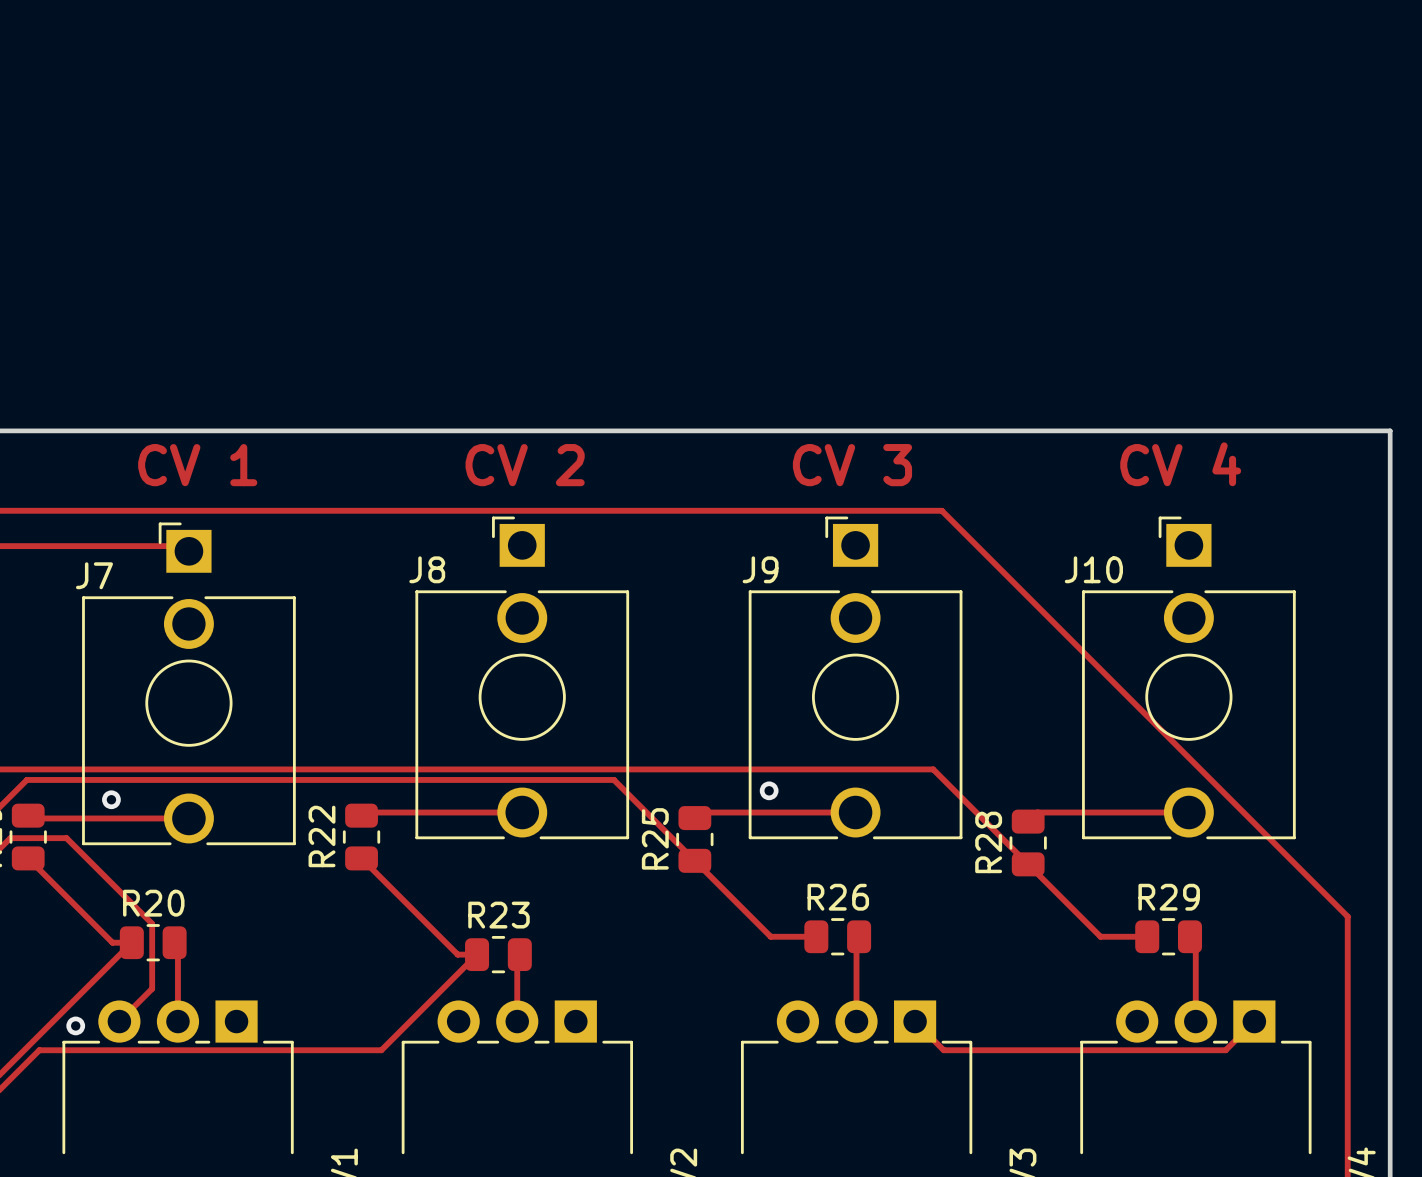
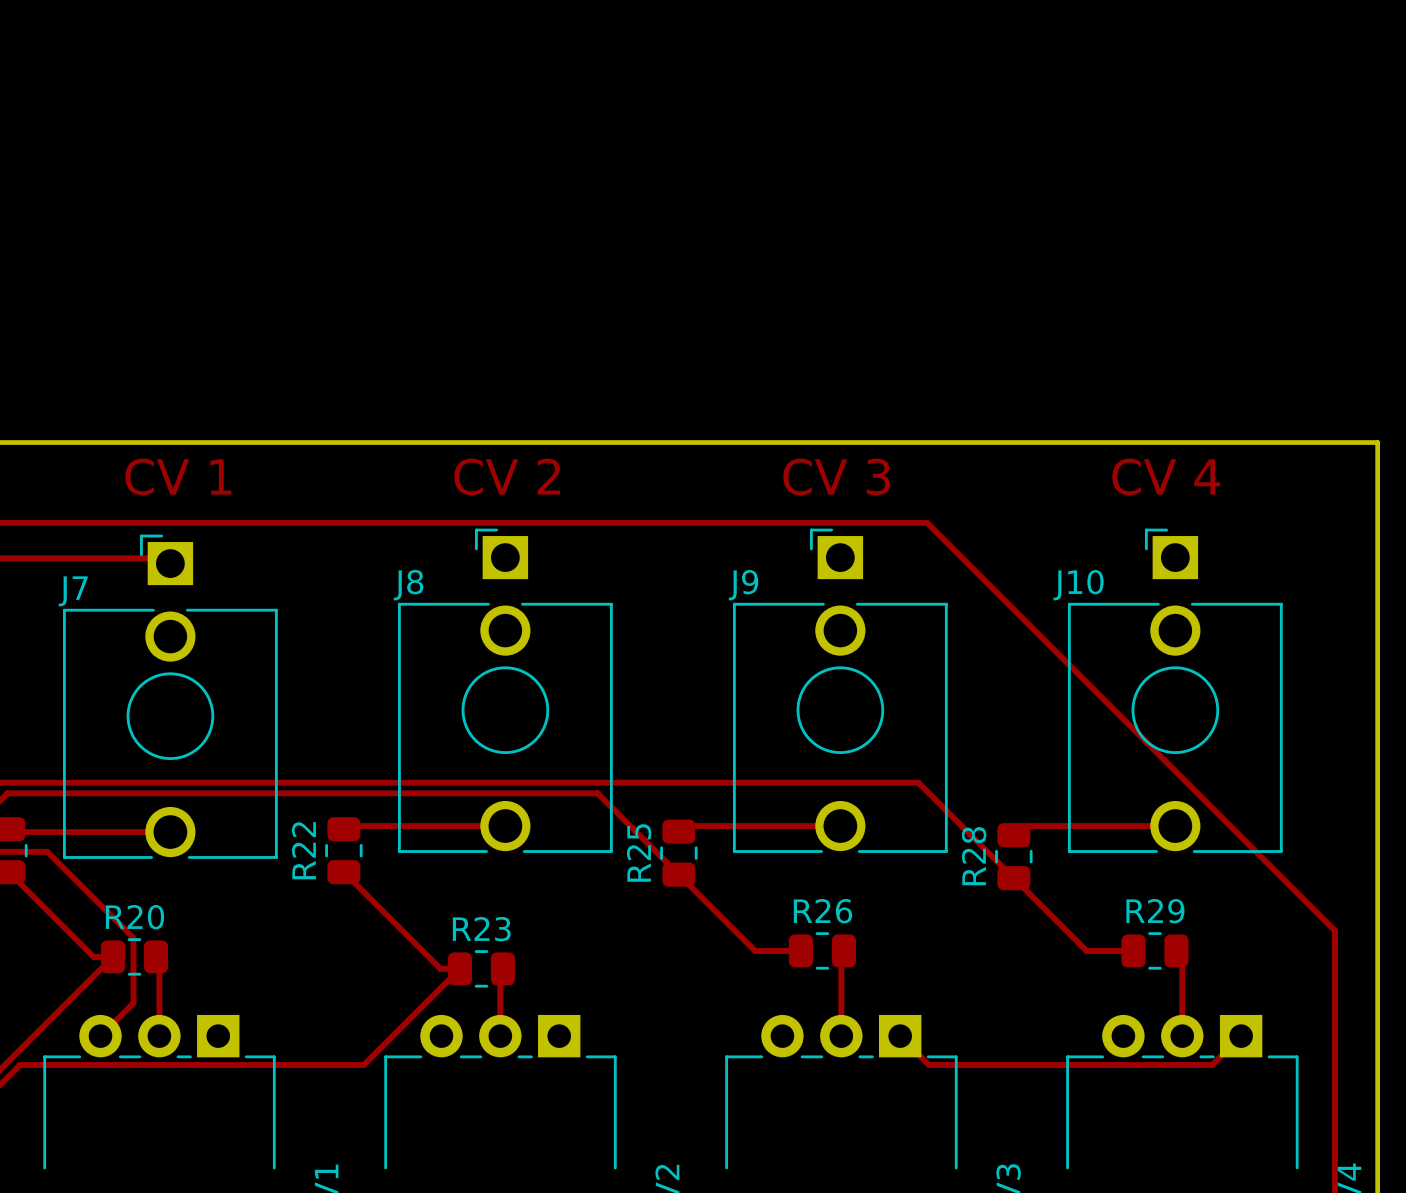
via: (769, 790) -> none
via: (111, 799) -> none
via: (75, 1025) -> none

